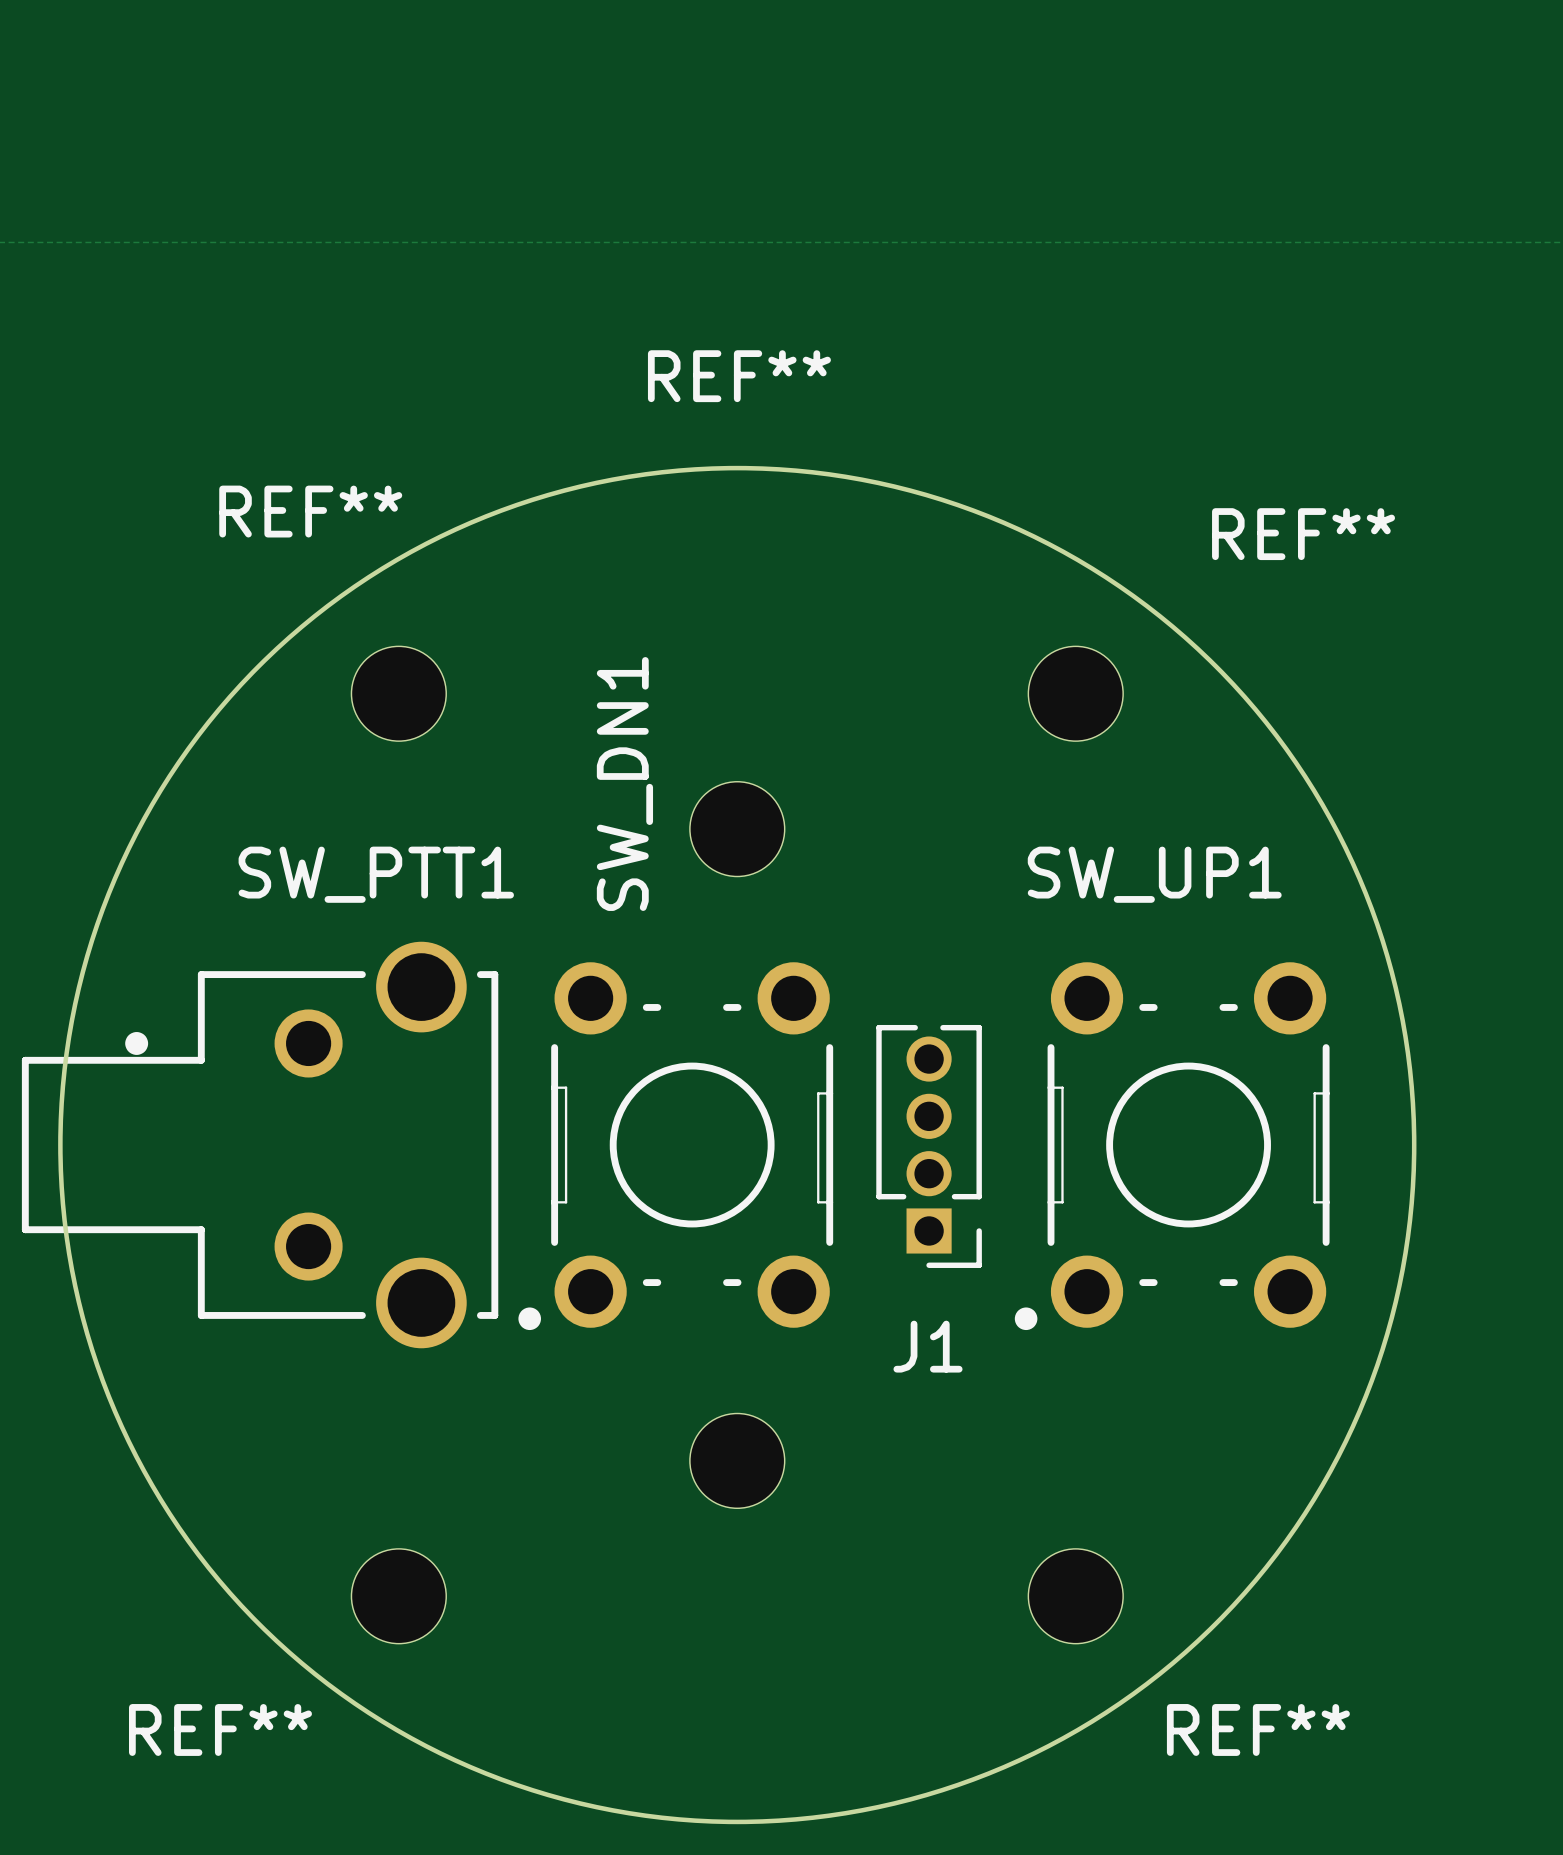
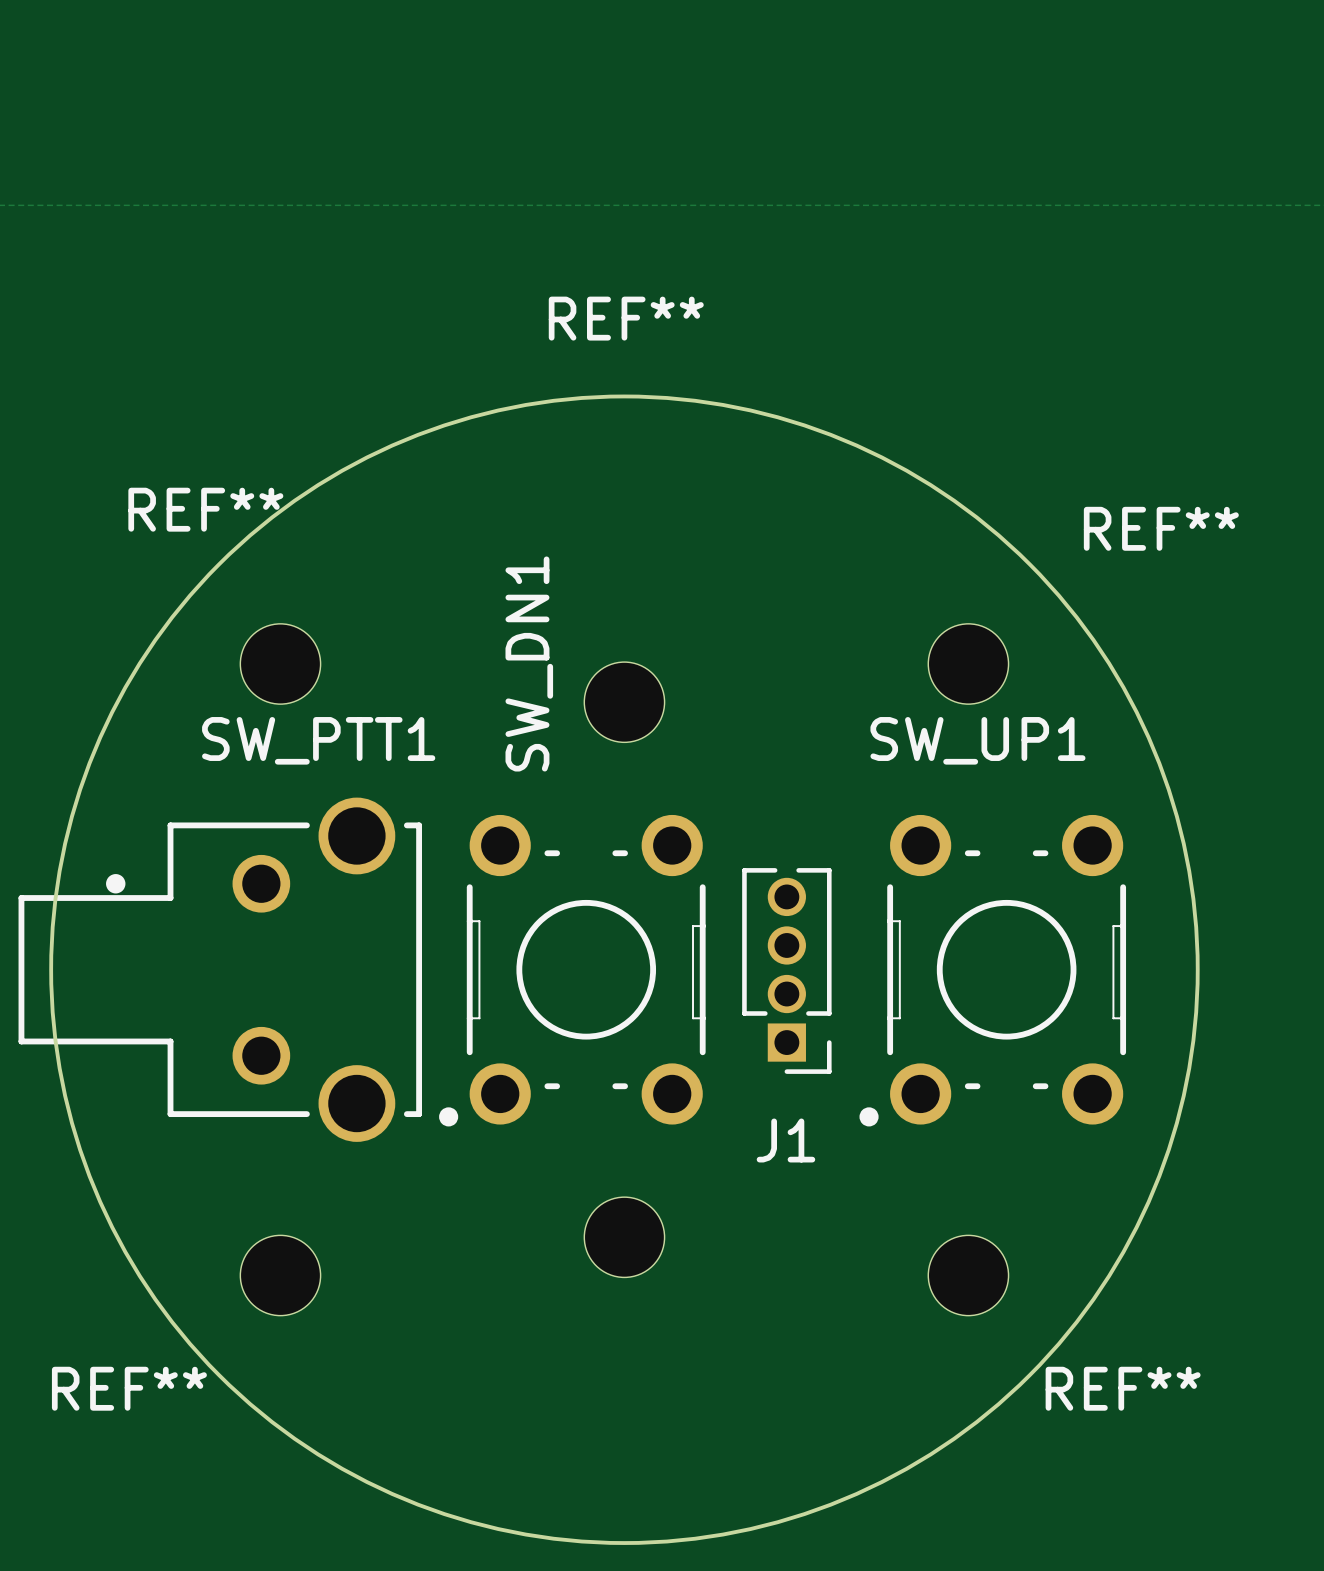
REF** position: (398, 693) -> (280, 663)
REF** position: (1075, 693) -> (968, 663)
REF** position: (398, 1596) -> (280, 1275)
REF** position: (1075, 1596) -> (968, 1275)

